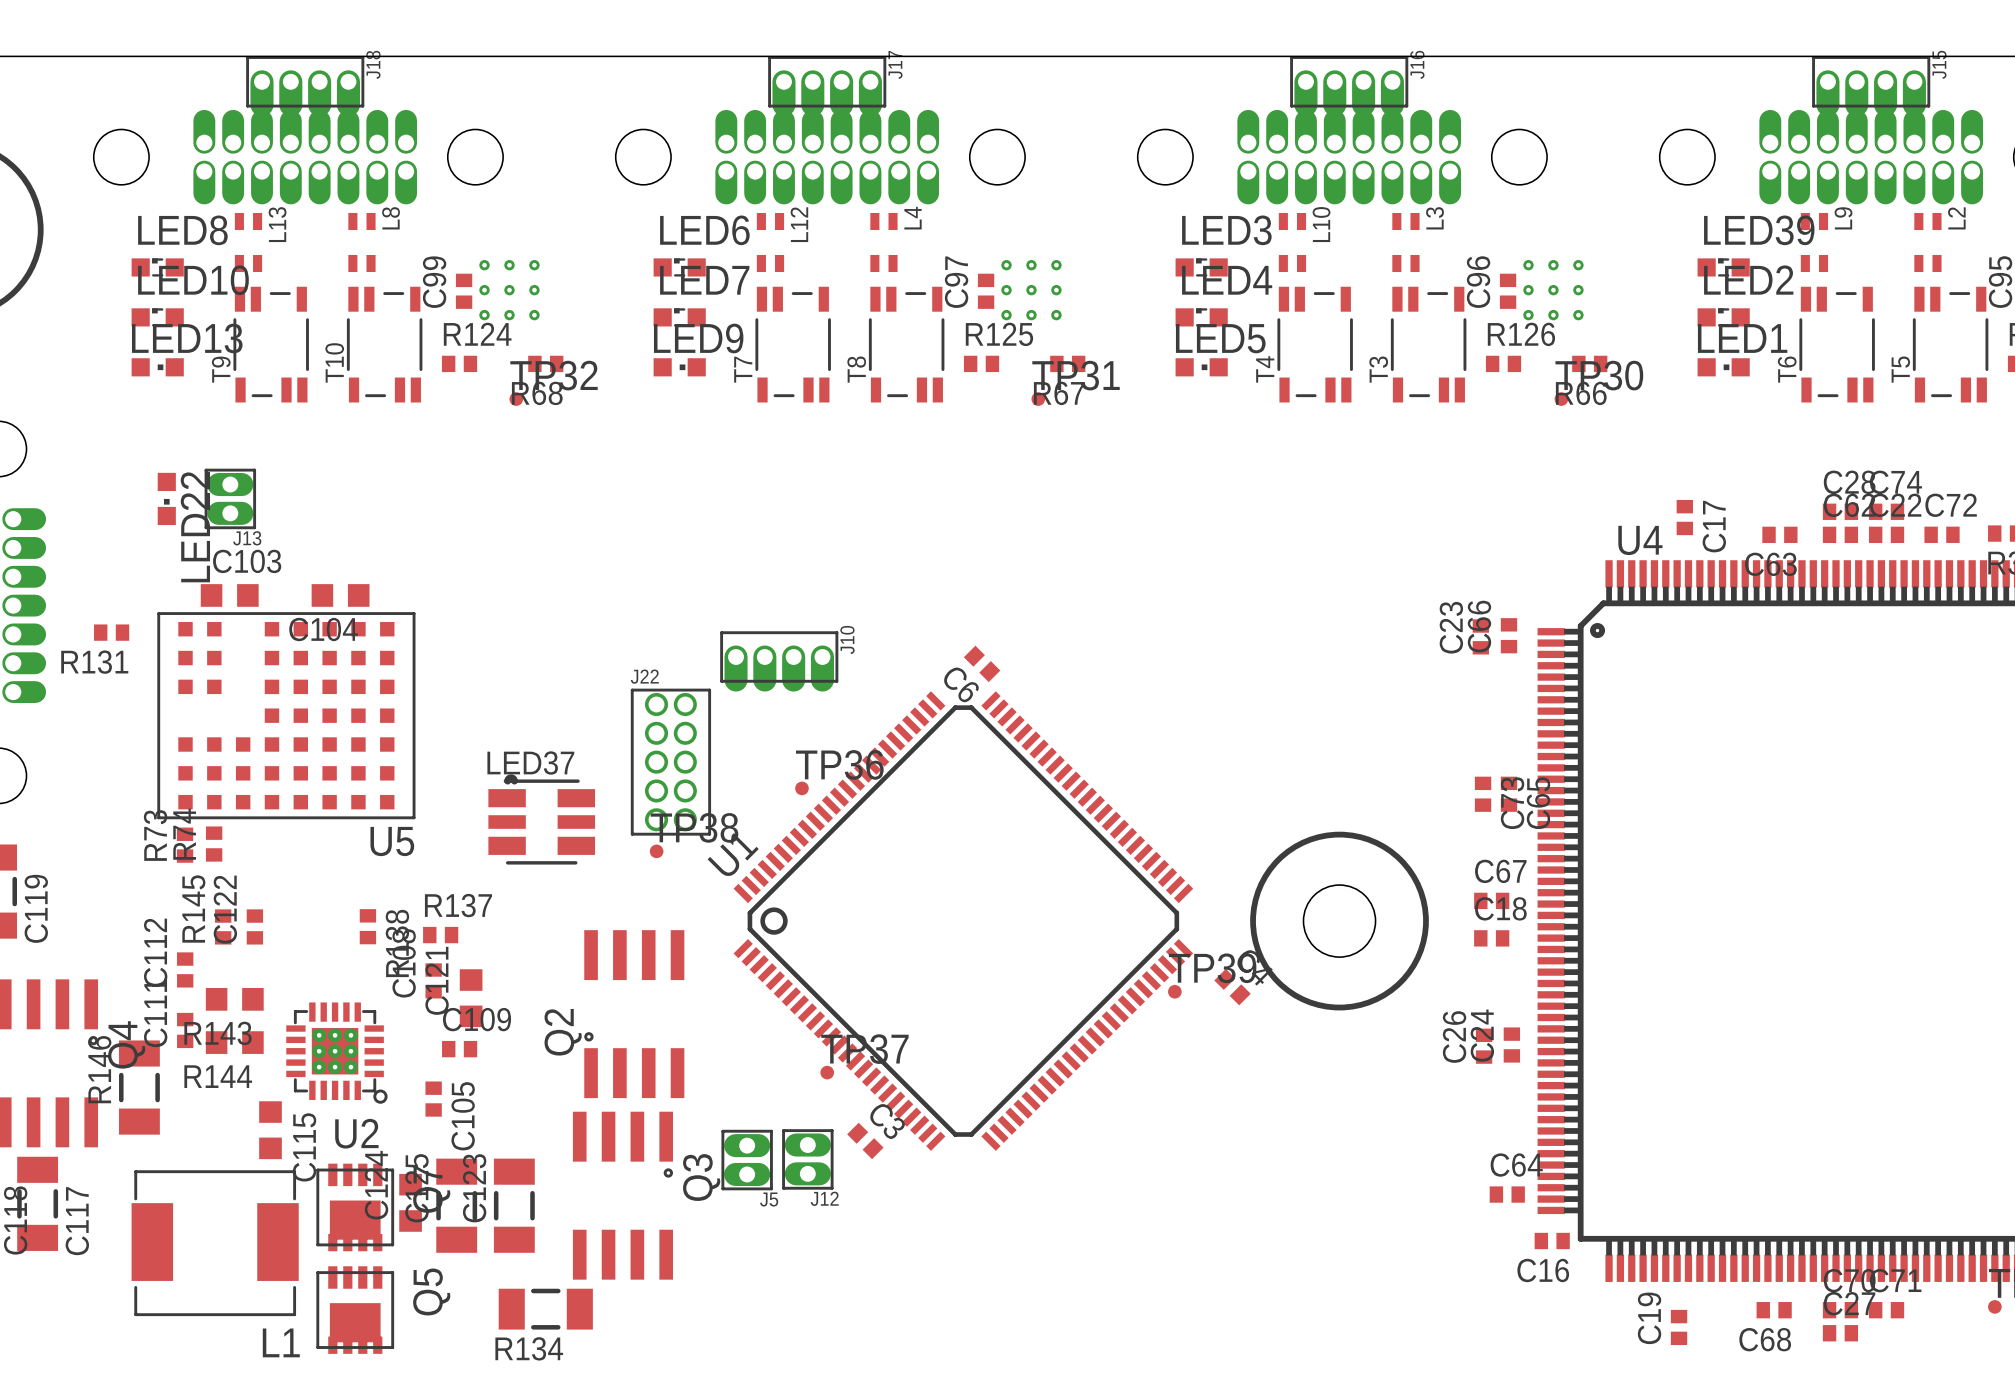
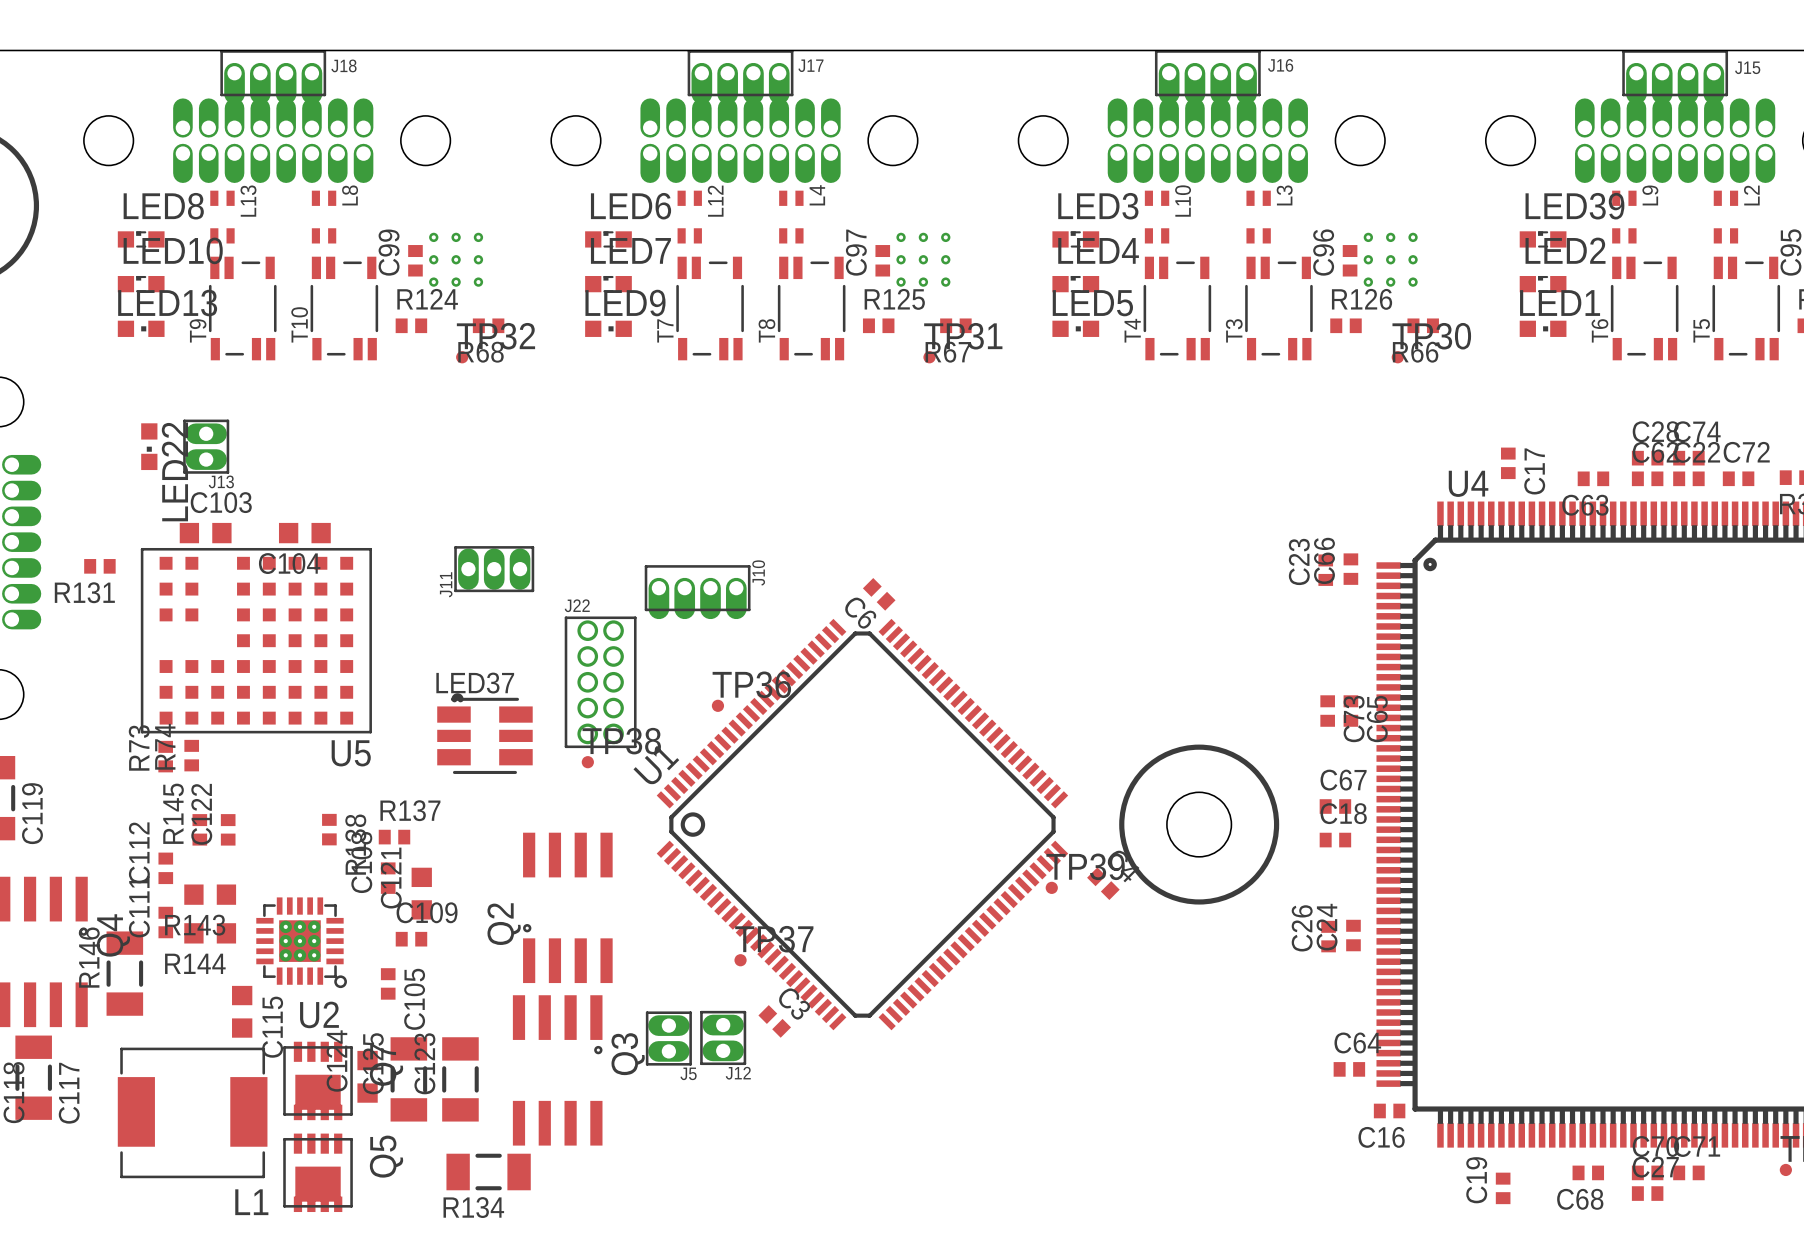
J18 name rotation: 0° (373, 64) -> 90° clockwise (343, 65)
J17 name rotation: 0° (895, 64) -> 90° clockwise (810, 65)
J16 name rotation: 0° (1417, 64) -> 90° clockwise (1280, 65)
J15 name rotation: 0° (1939, 64) -> 90° clockwise (1747, 67)
J11: none -> (494, 569)

